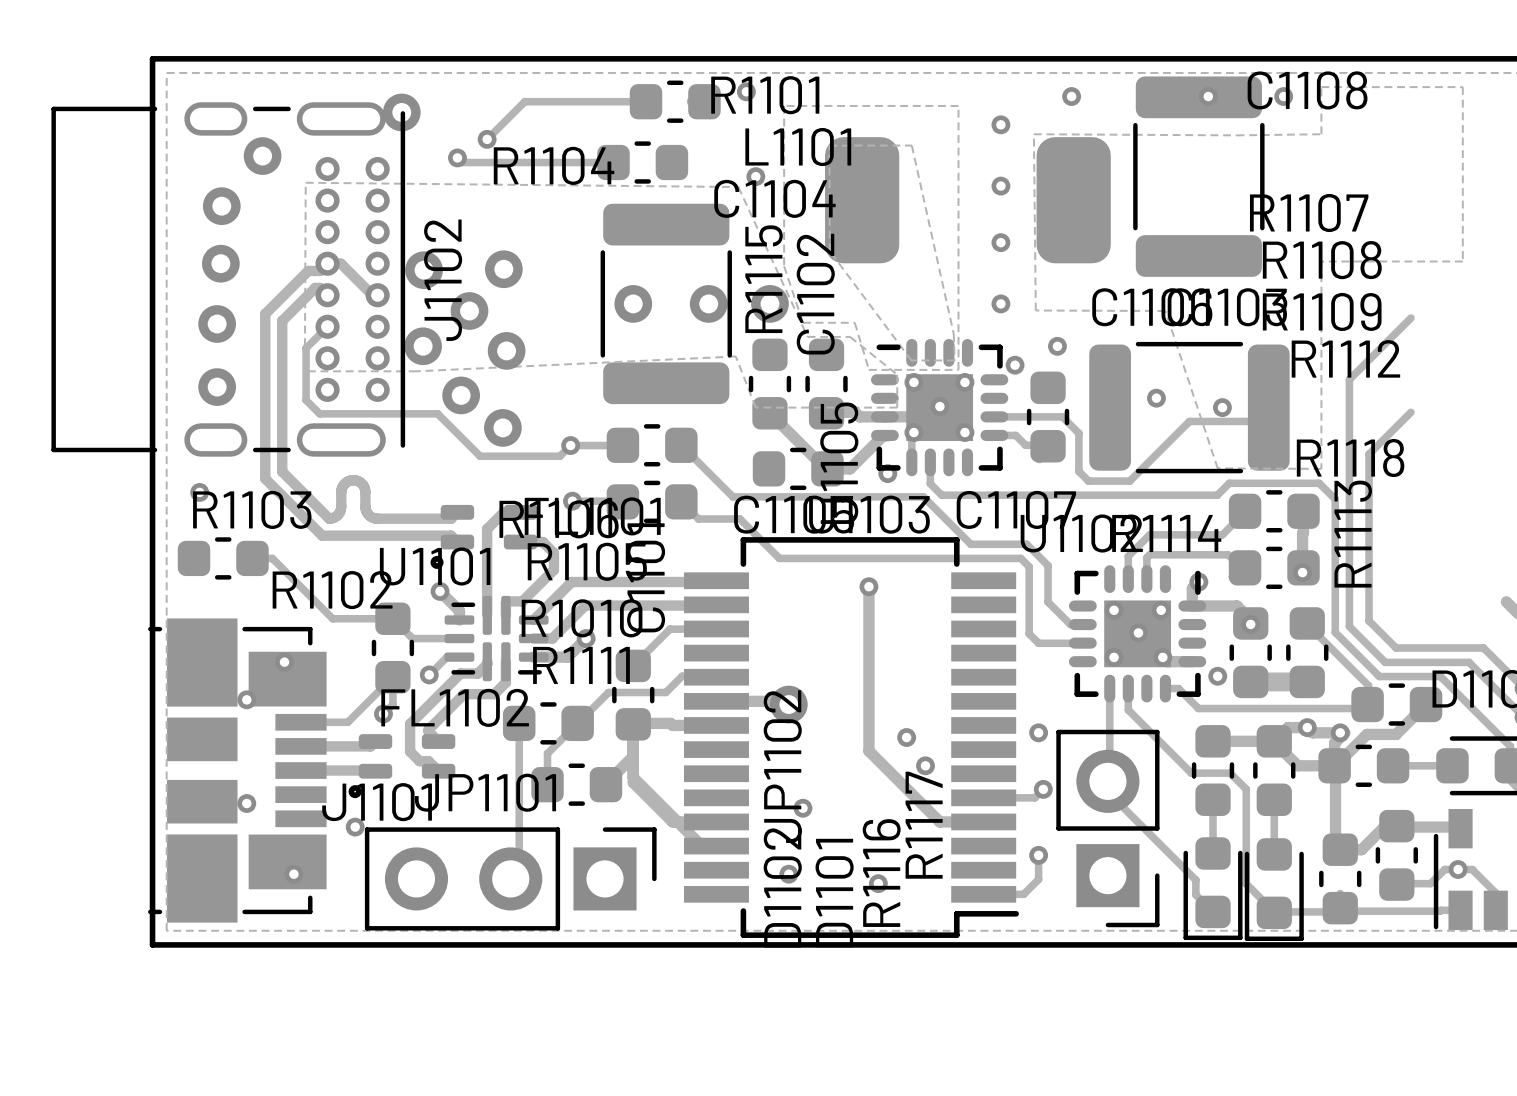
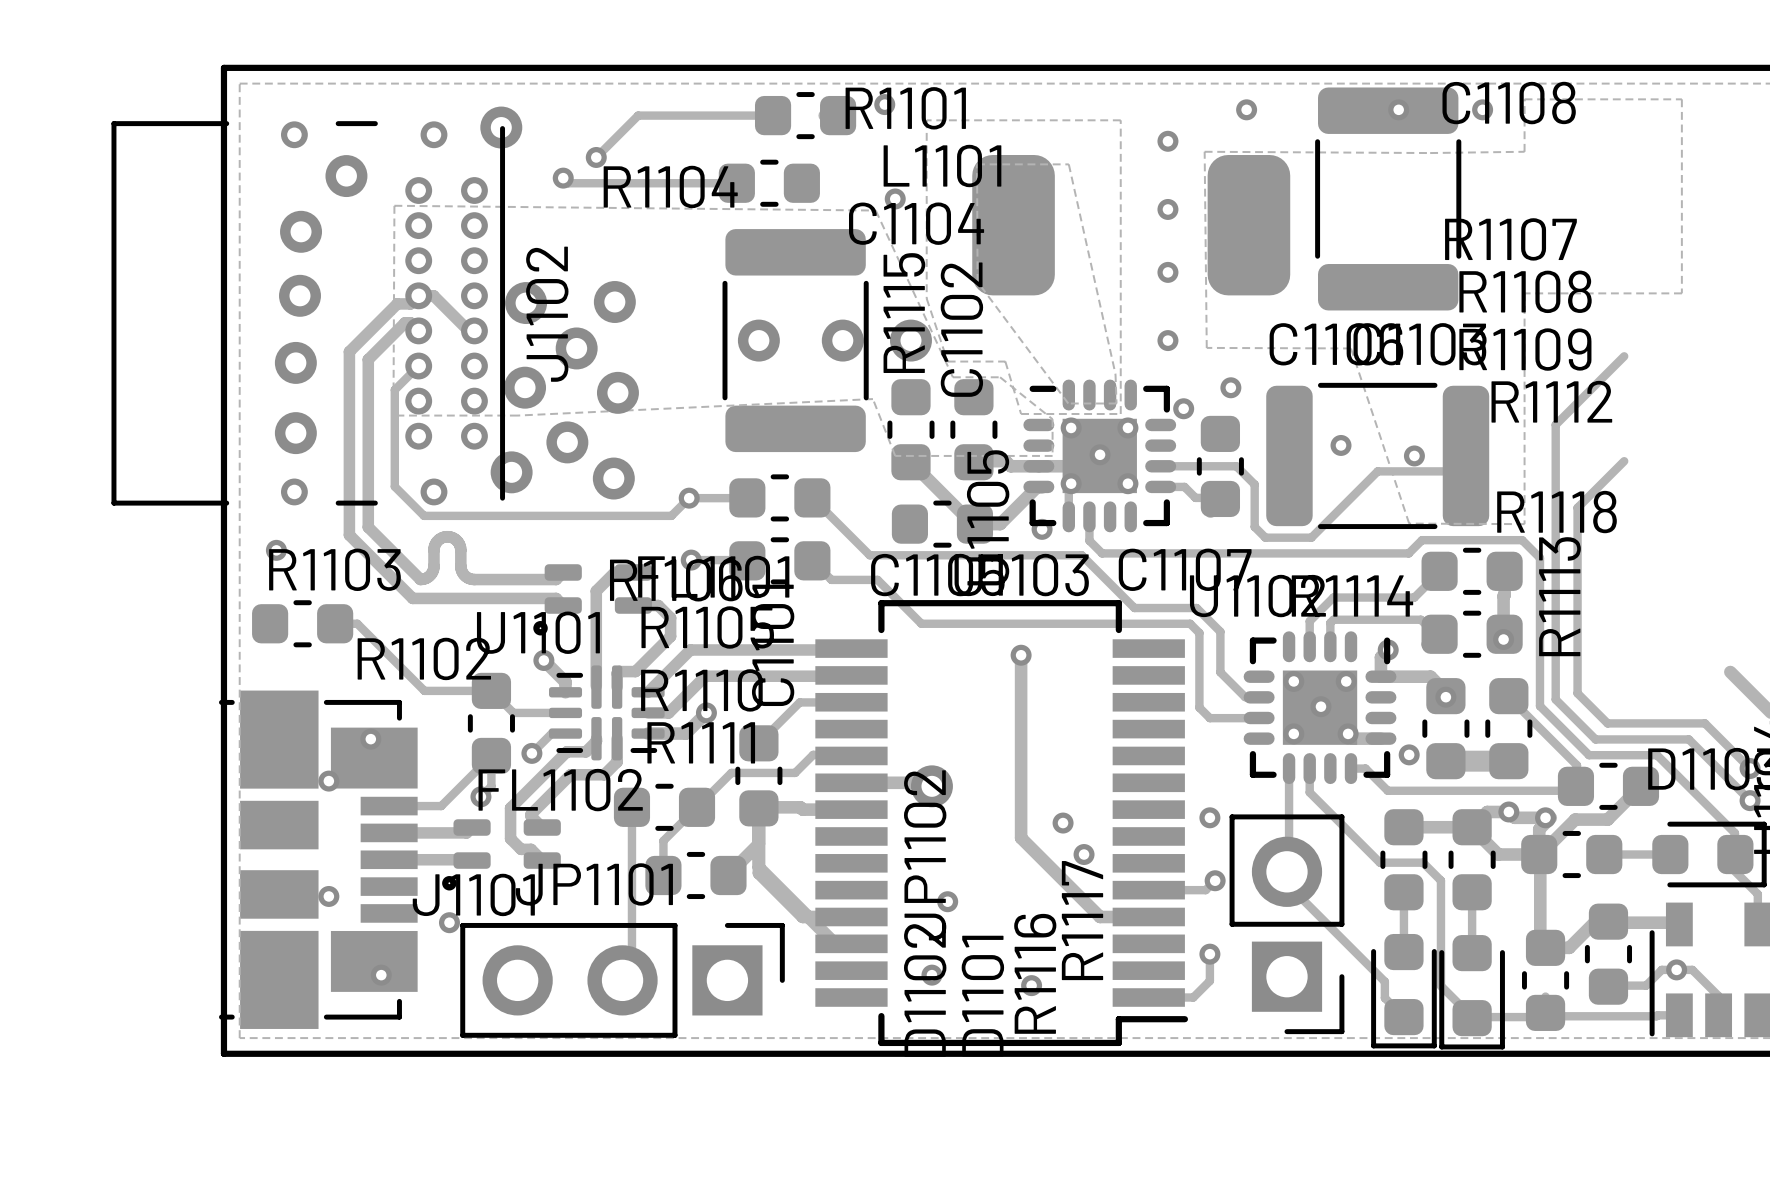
J1102 footprint: [51, 102, 406, 457] -> [111, 121, 506, 506]
track: (306, 400) (319, 413) (437, 413) (480, 456) (559, 456) -> (394, 447) (394, 486) (424, 515) (671, 515) (677, 510)
via: none -> (511, 472)
R1010 name: R1010 (582, 618) -> R1110 (701, 690)

